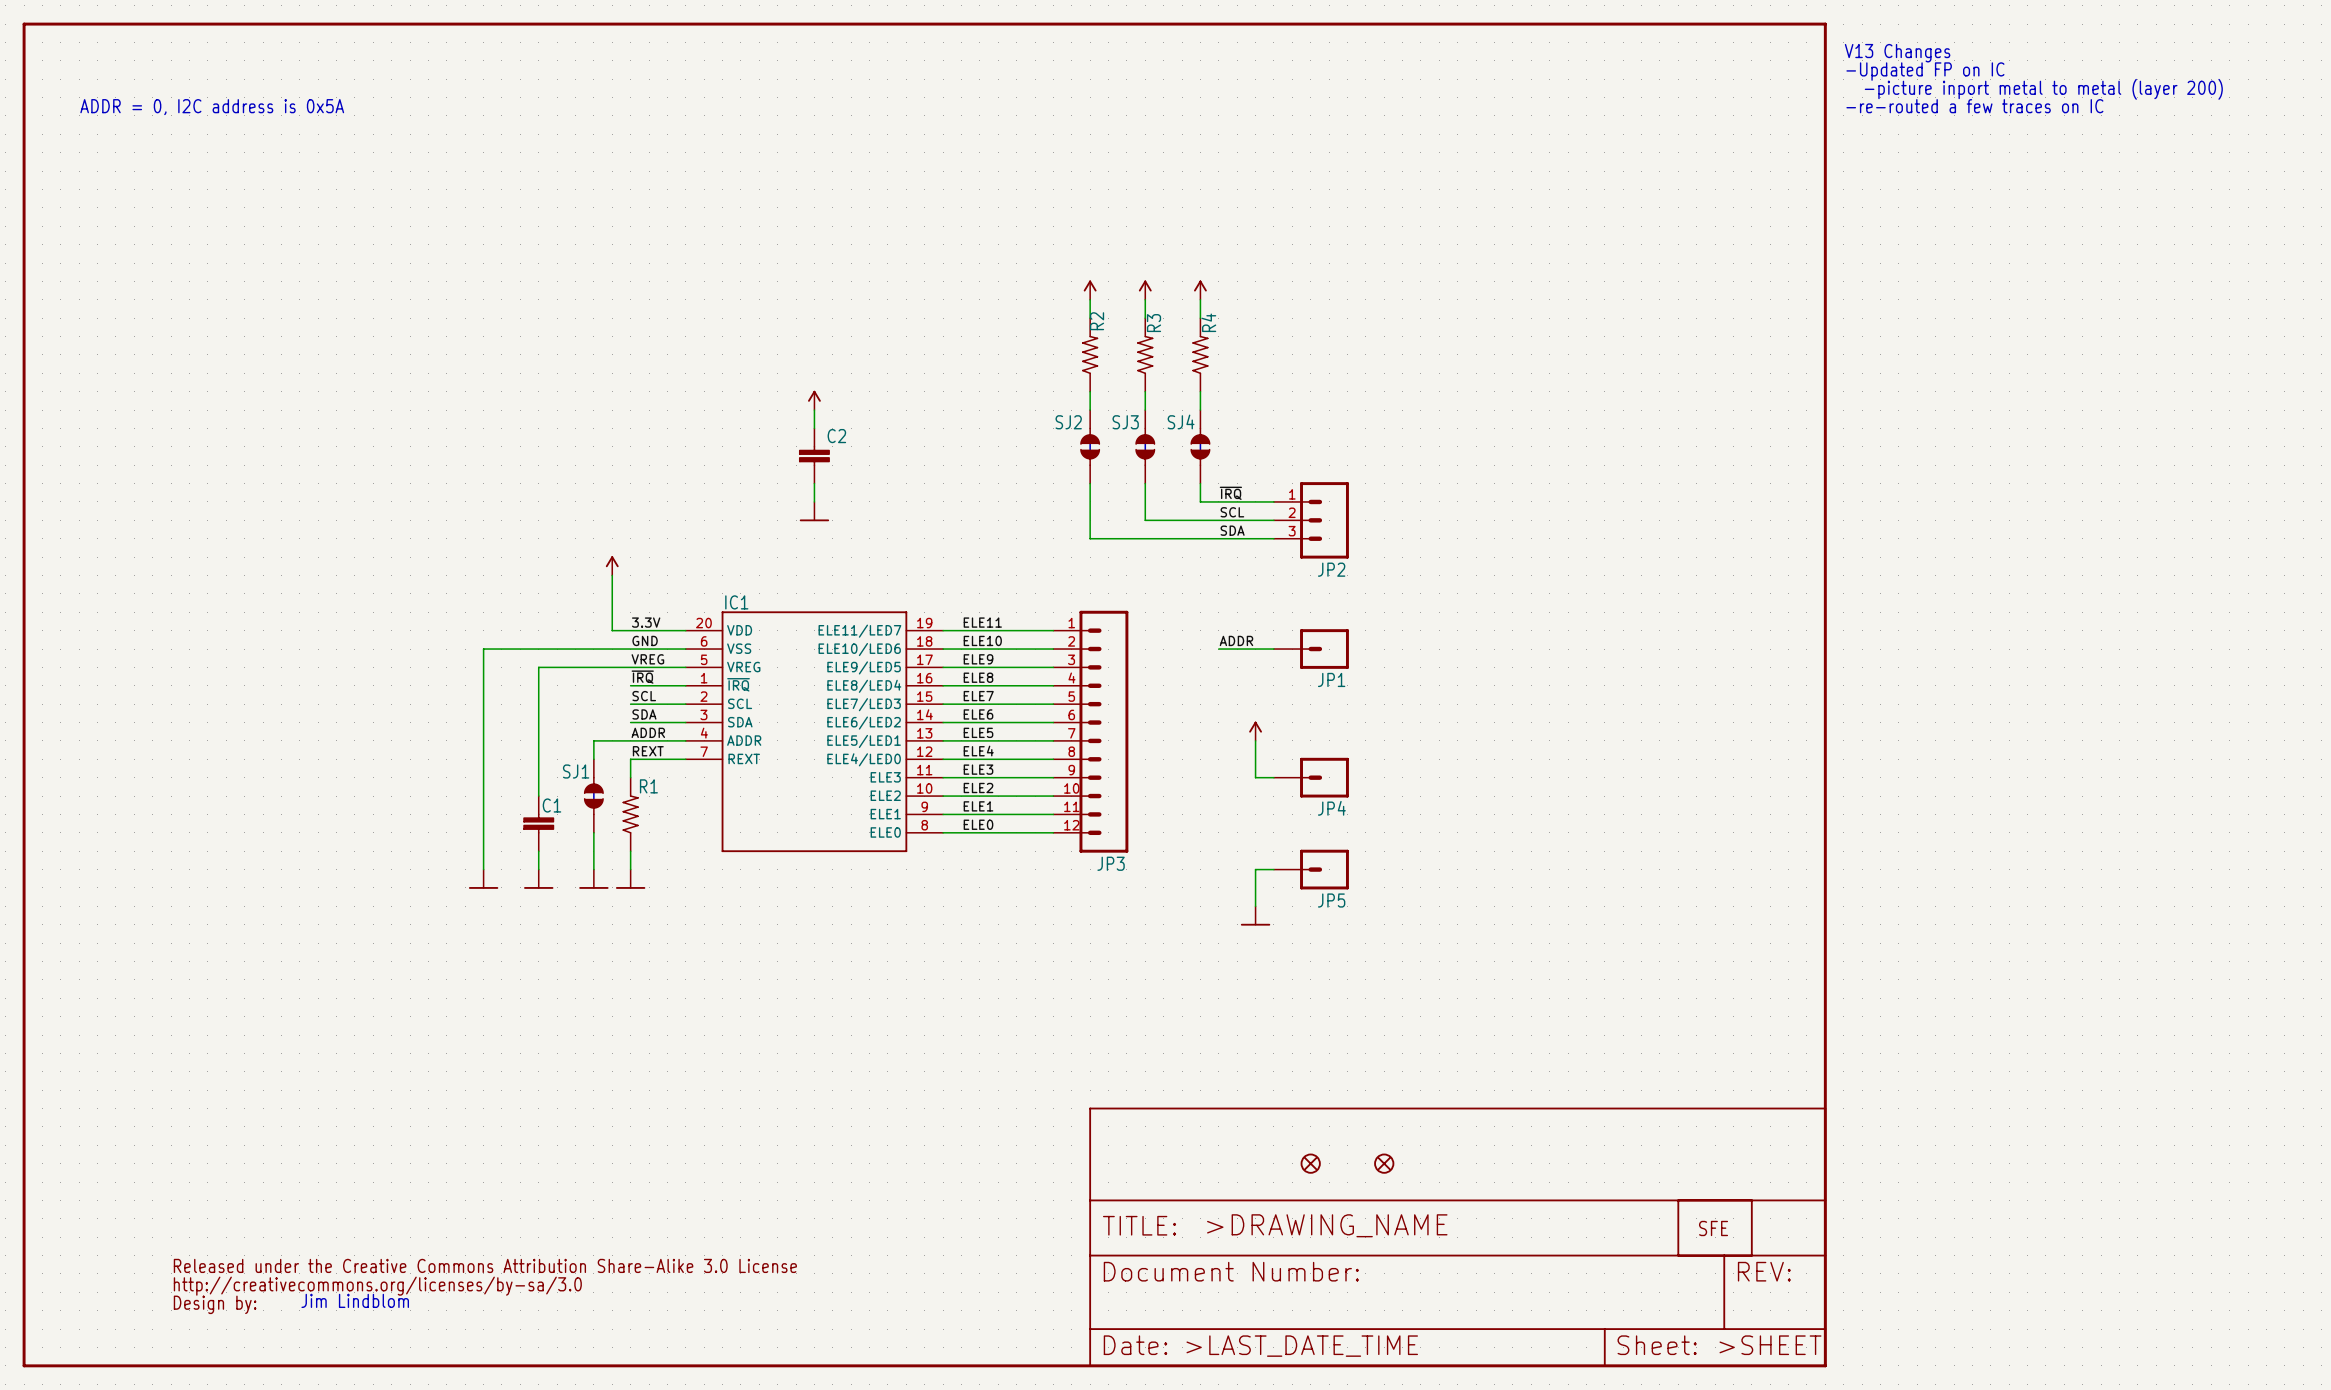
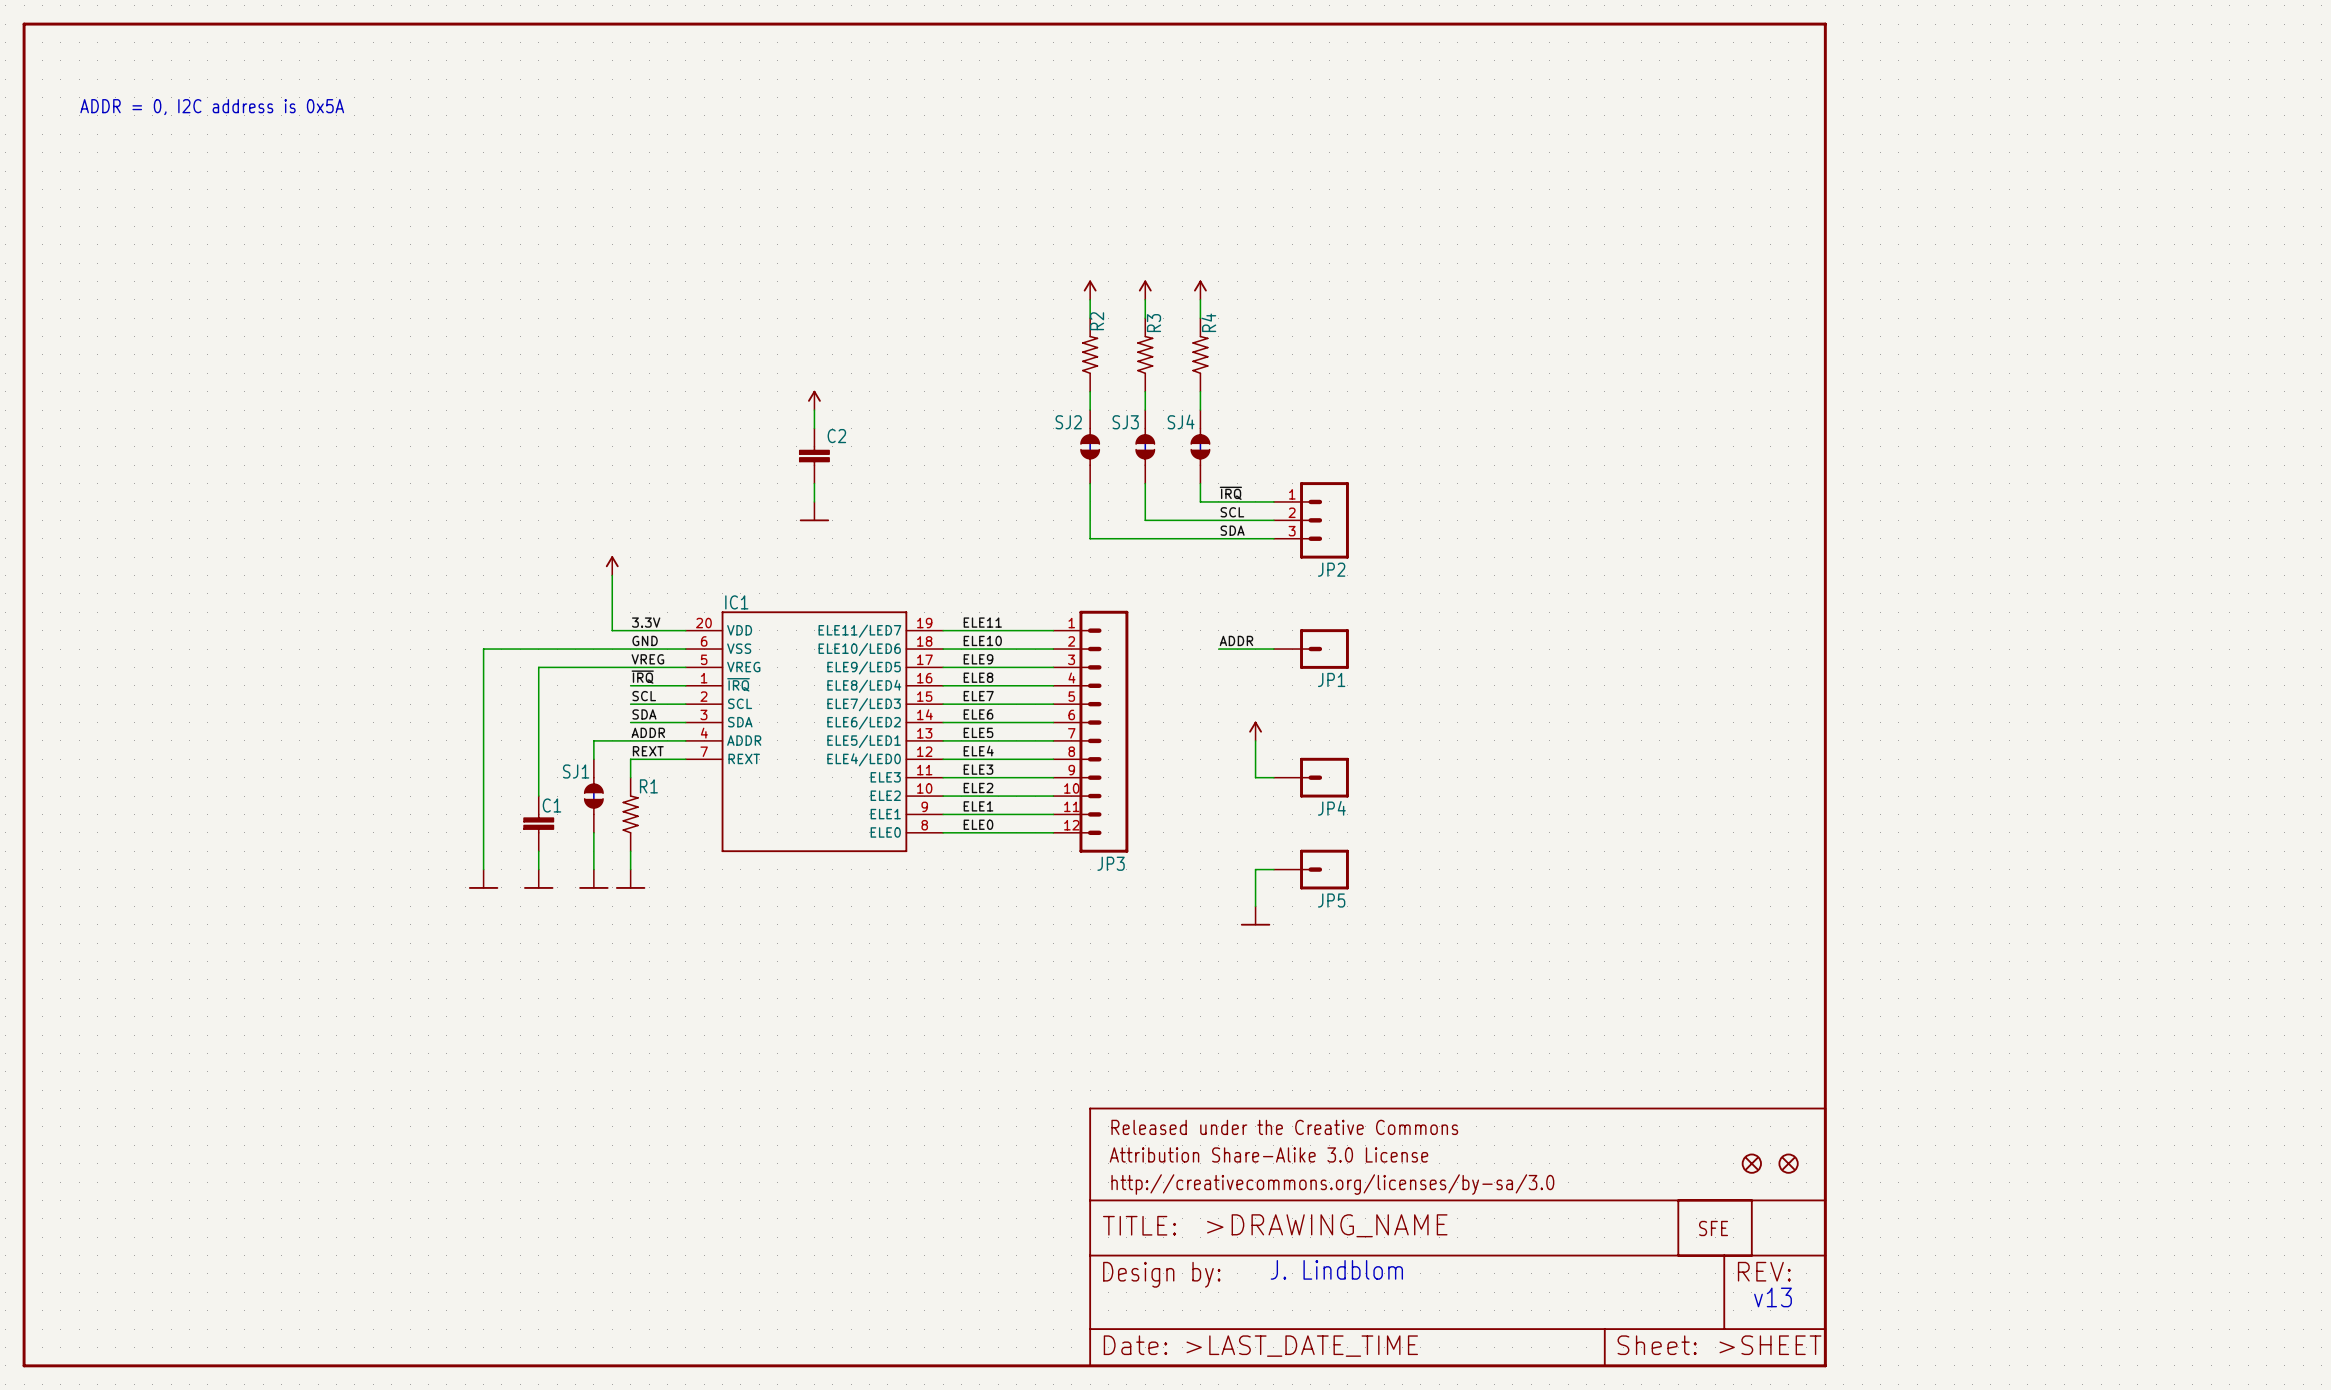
text: V13 Changes (1897, 53) -> none
text: -Updated FP on IC (1925, 71) -> none
text: -picture inport metal to metal (layer 200) (2043, 89) -> none
text: -re-routed a few traces on IC (1974, 106) -> none
part: (1310, 1163) -> none
part: (1384, 1163) -> none
part: none -> (1751, 1163)
part: none -> (1788, 1163)
part: none -> (1457, 1237)
power symbol: (1457, 1237) -> none
text: none -> J. Lindblom (1336, 1269)
part: (485, 1286) -> none
text: none -> v13 (1773, 1297)
text: Jim Lindblom (355, 1300) -> none

